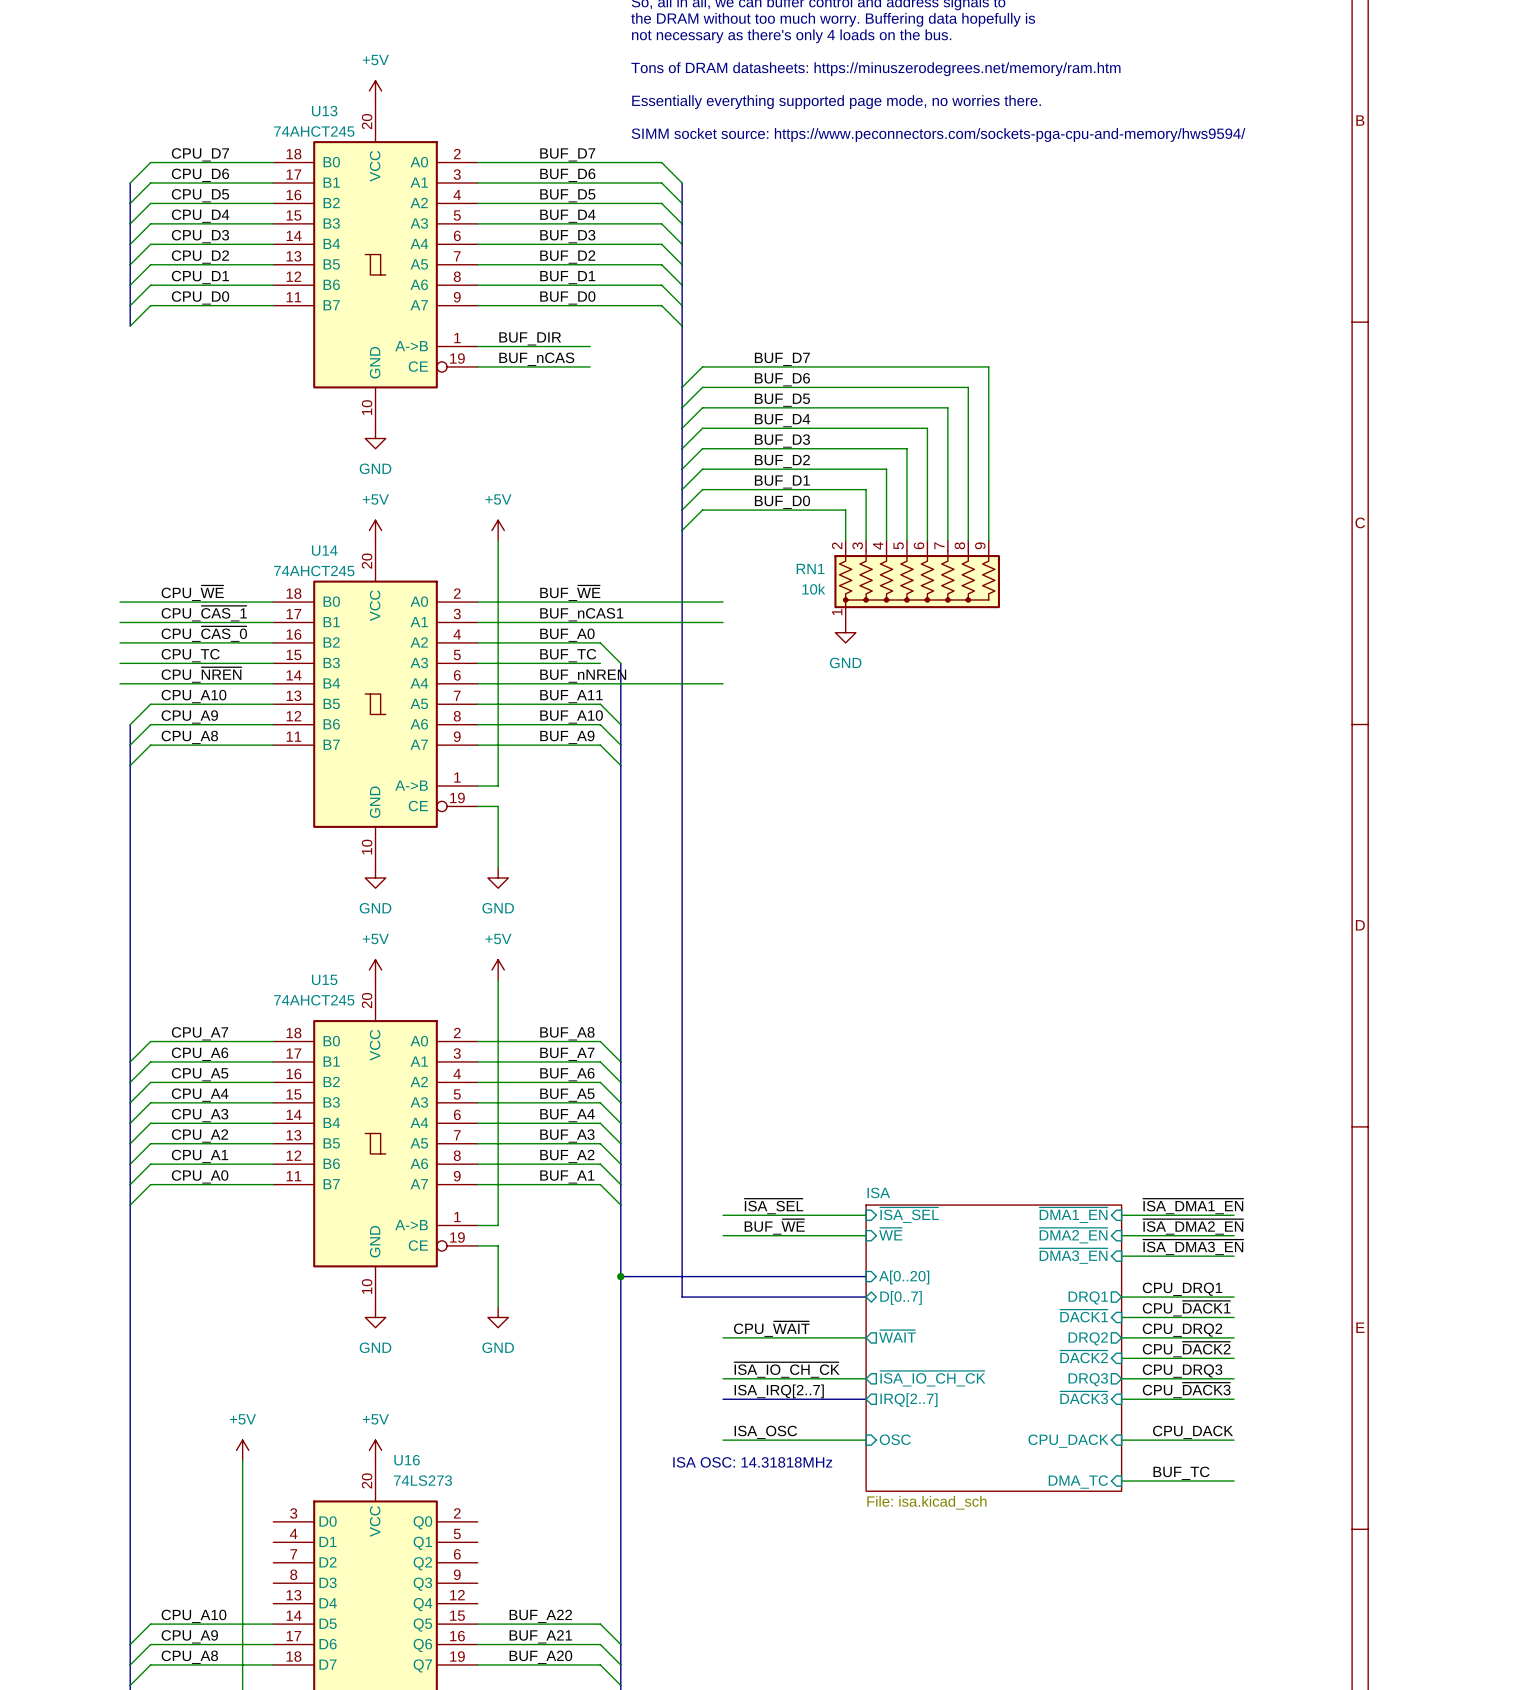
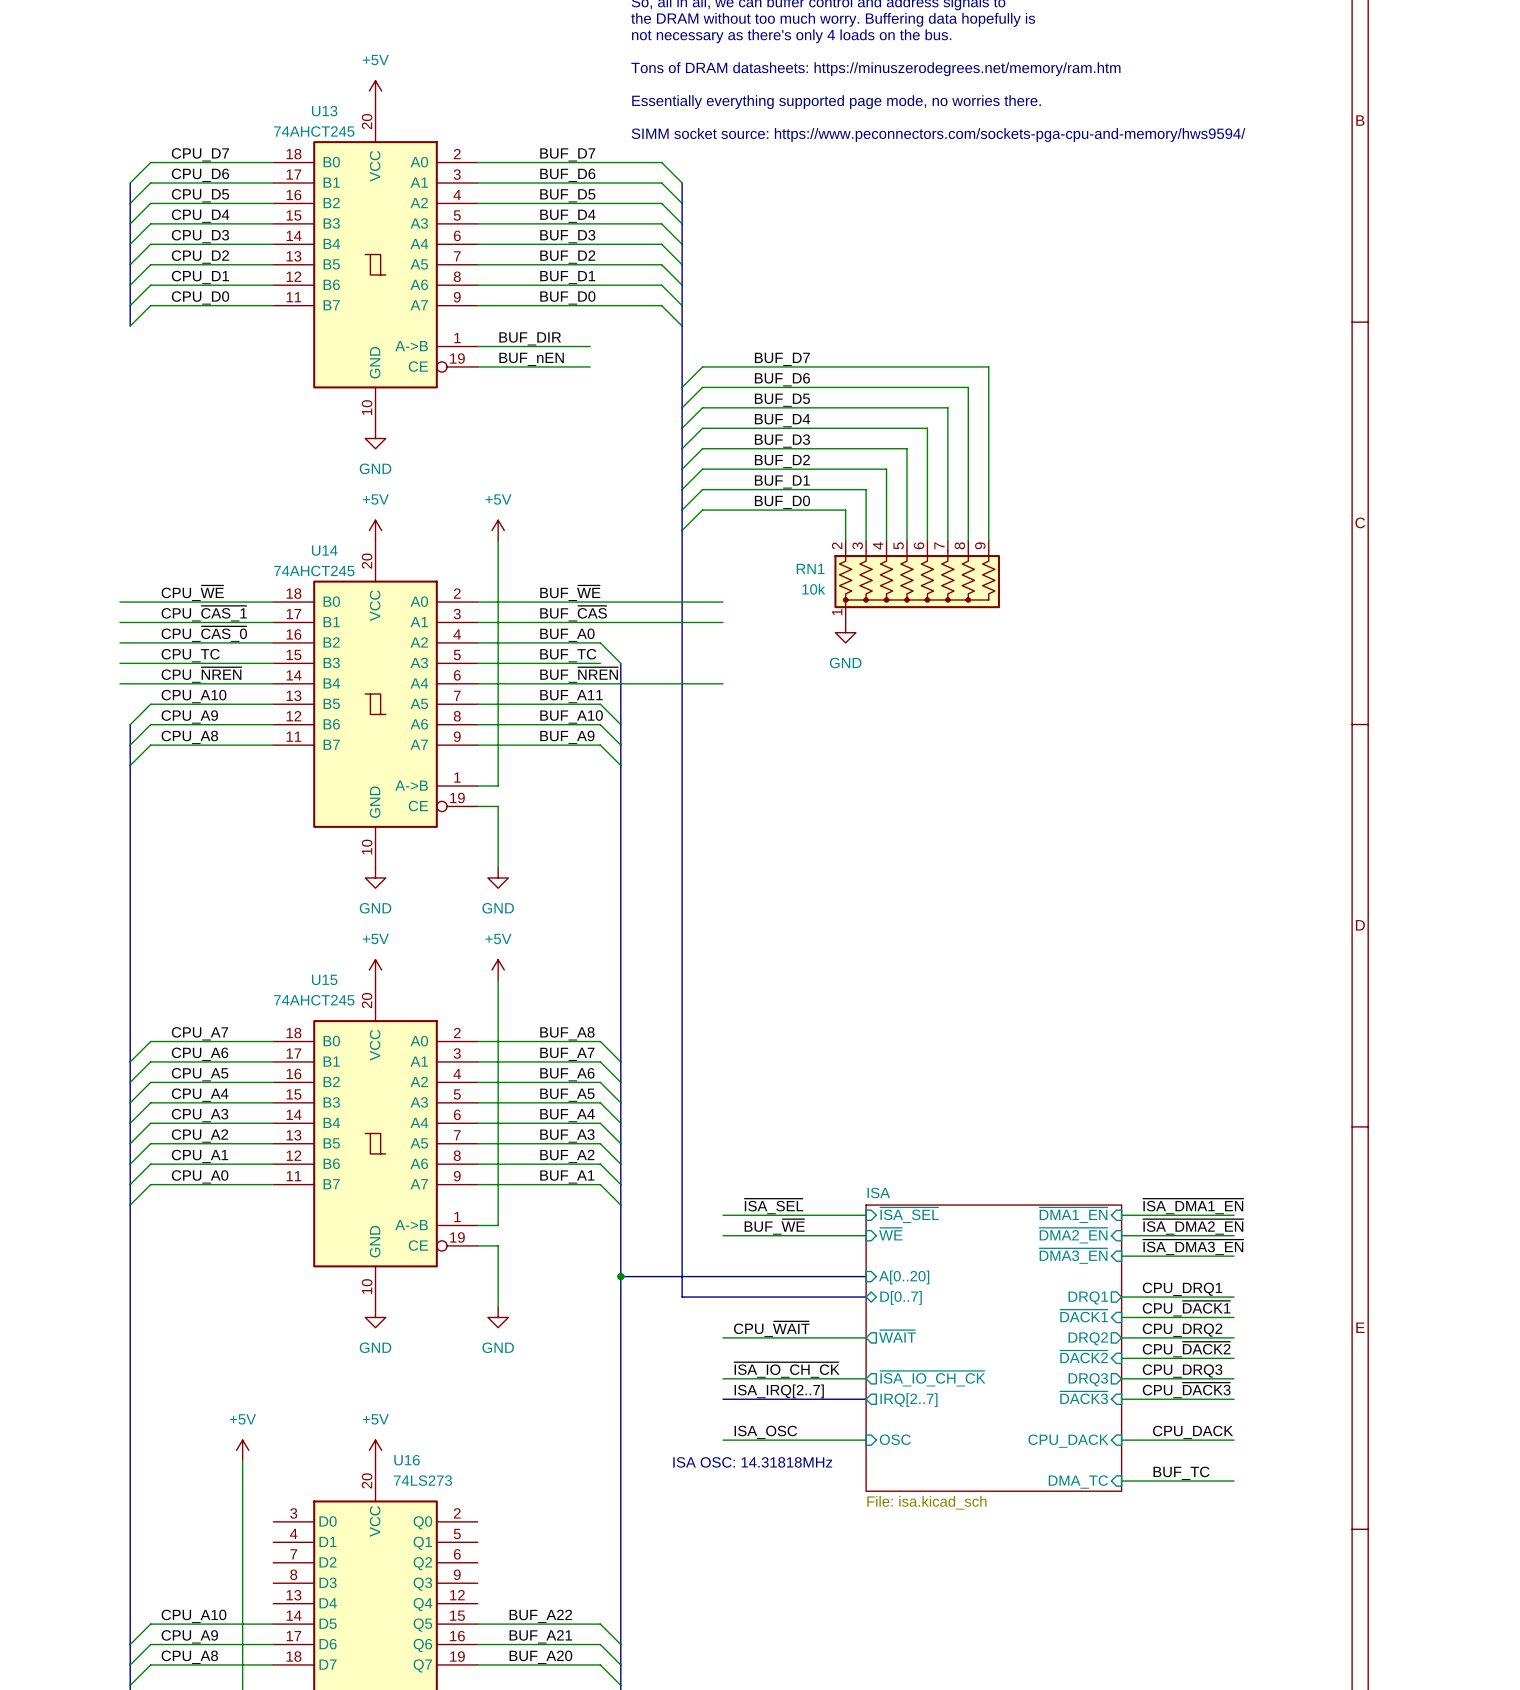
label: BUF_nCAS (536, 359) -> BUF_nEN (531, 359)
label: BUF_nCAS1 (581, 614) -> BUF_~{CAS} (573, 613)
label: BUF_nNREN (583, 676) -> BUF_~{NREN} (579, 674)

